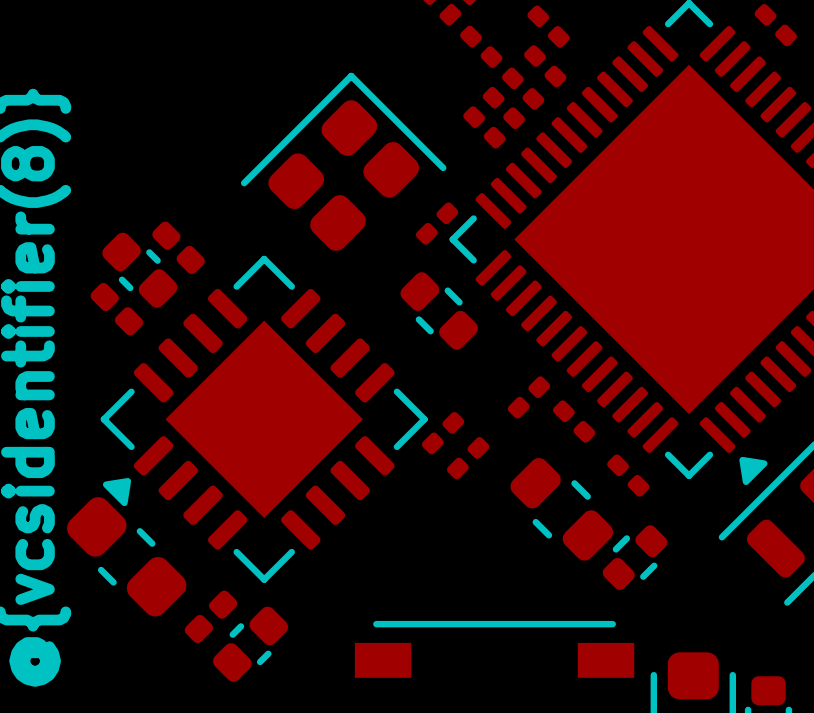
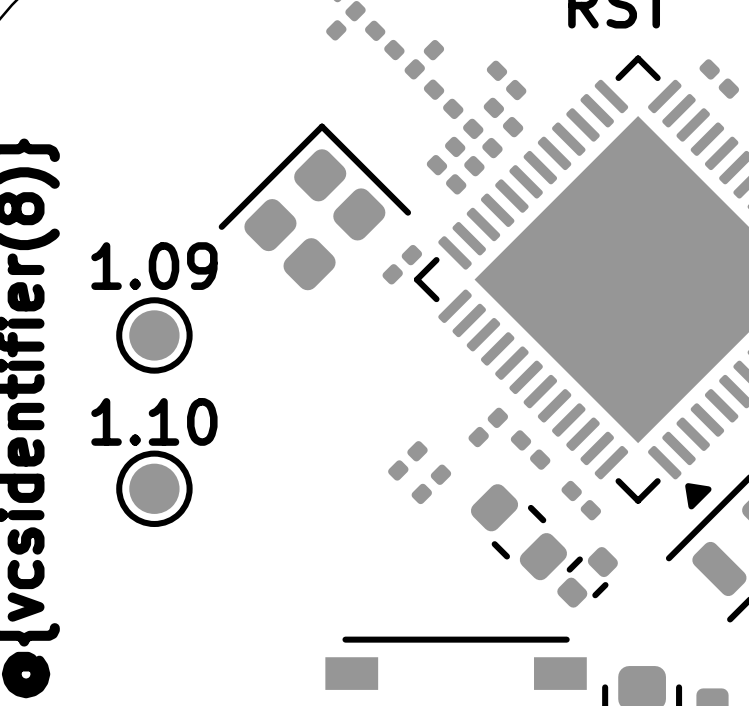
text: none -> 1.09 (154, 266)
part: (178, 247) -> none
part: (139, 270) -> none
part: none -> (154, 335)
part: (116, 309) -> none
part: (439, 310) -> none
text: none -> 1.10 (154, 421)
part: (264, 419) -> none
part: none -> (154, 488)
part: (126, 556) -> none
part: (211, 616) -> none
part: (250, 644) -> none

